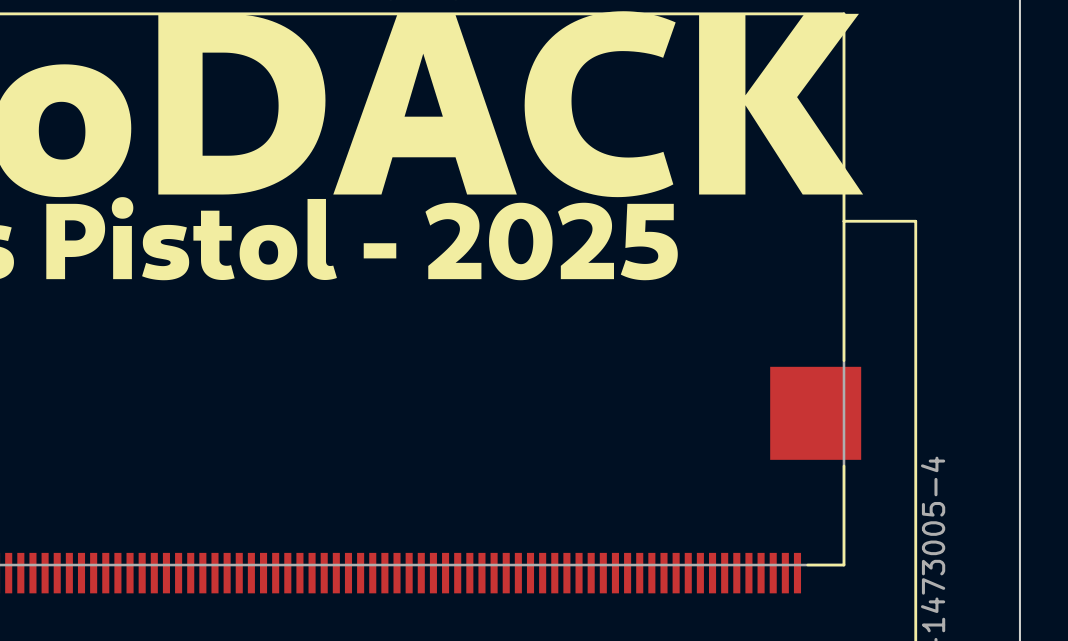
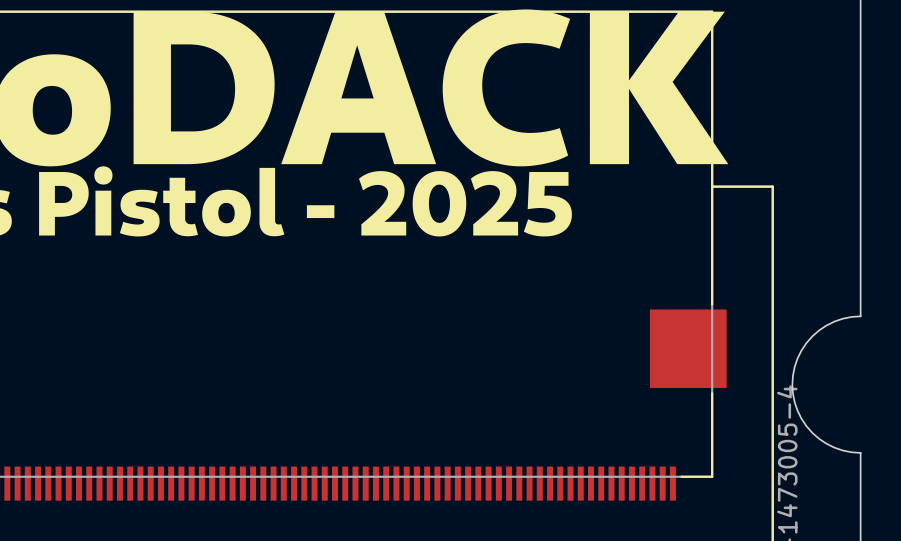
board edge: (1019, 374) (1019, 536) -> (860, 316) (834, 321) (812, 336) (797, 358) (792, 384) (797, 410) (812, 432) (834, 447) (860, 452)

